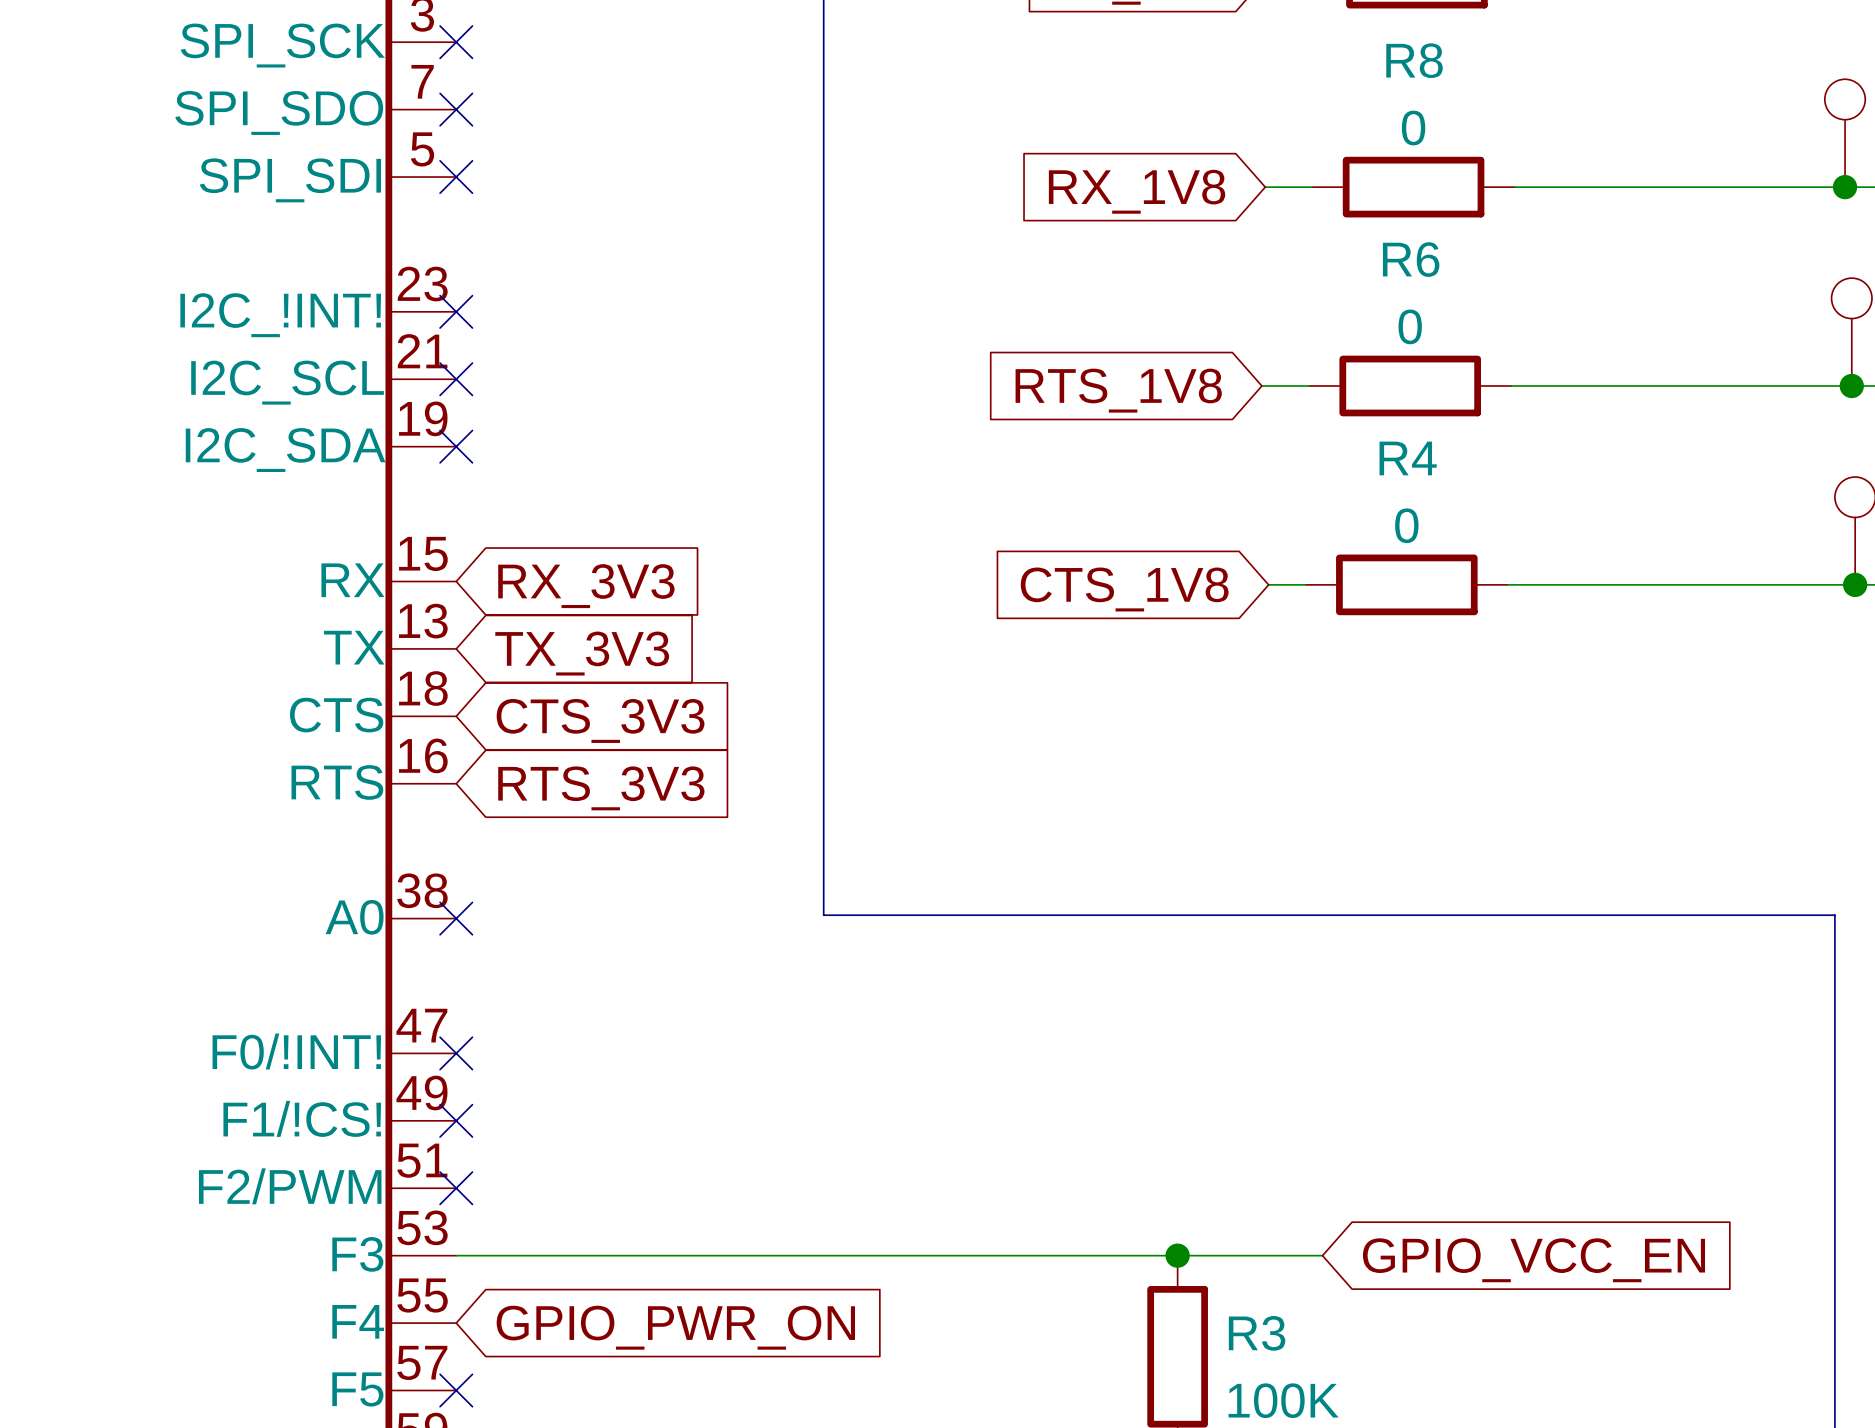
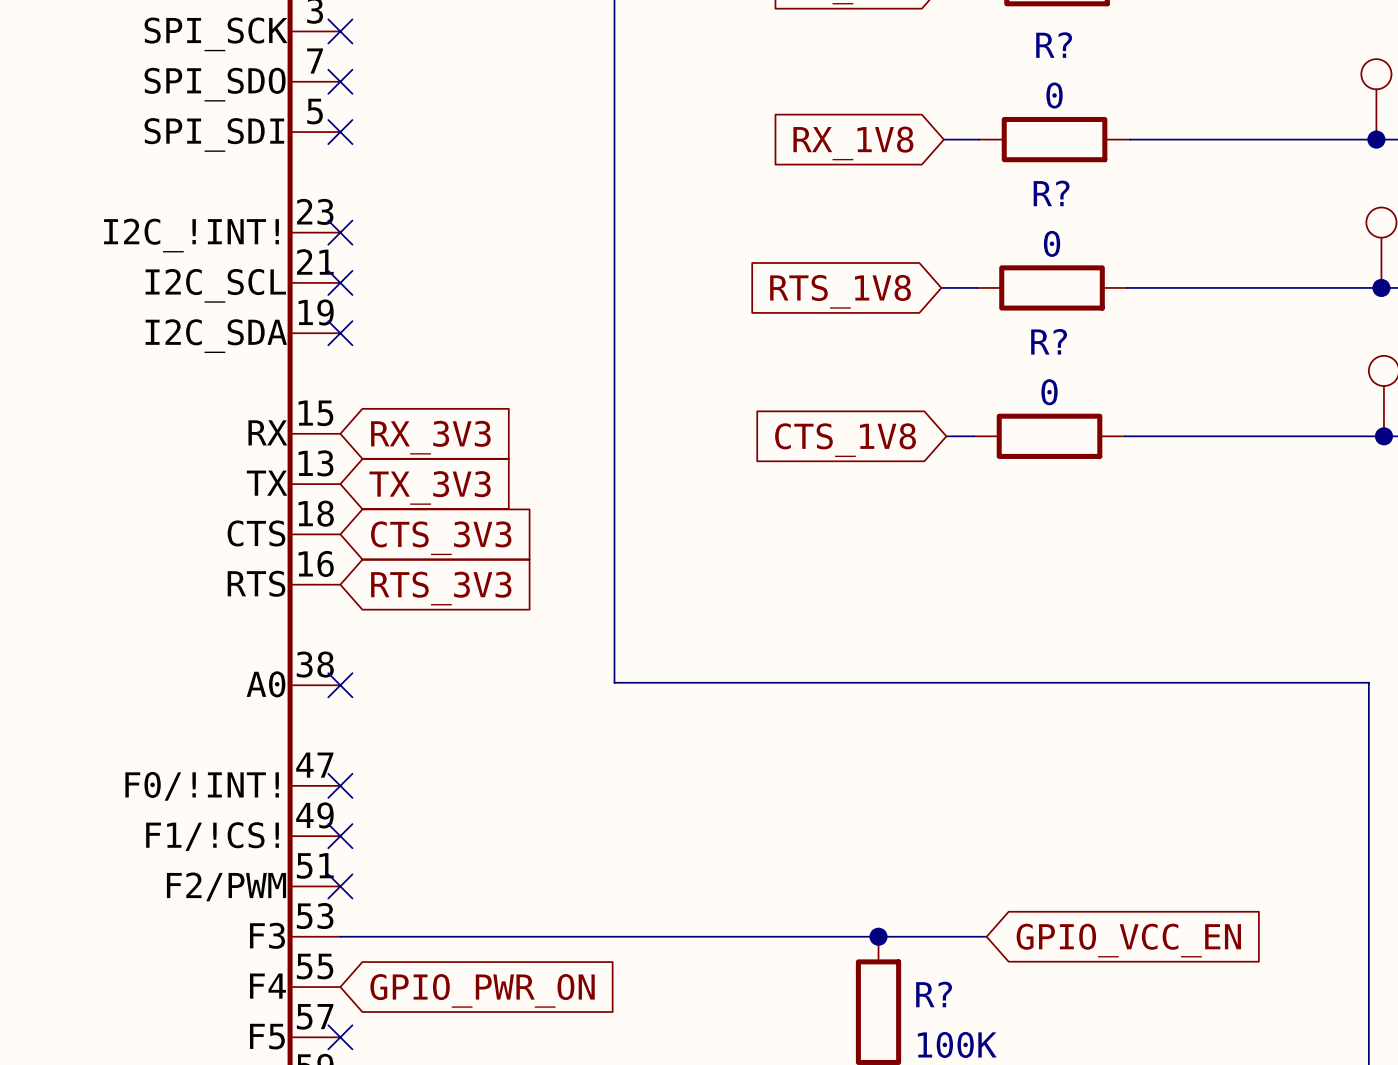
R8 name: R8 (1414, 60) -> R? (1054, 45)
R6 name: R6 (1411, 259) -> R? (1051, 193)
R4 name: R4 (1408, 458) -> R? (1049, 341)
R3 name: R3 (1257, 1333) -> R? (934, 994)

